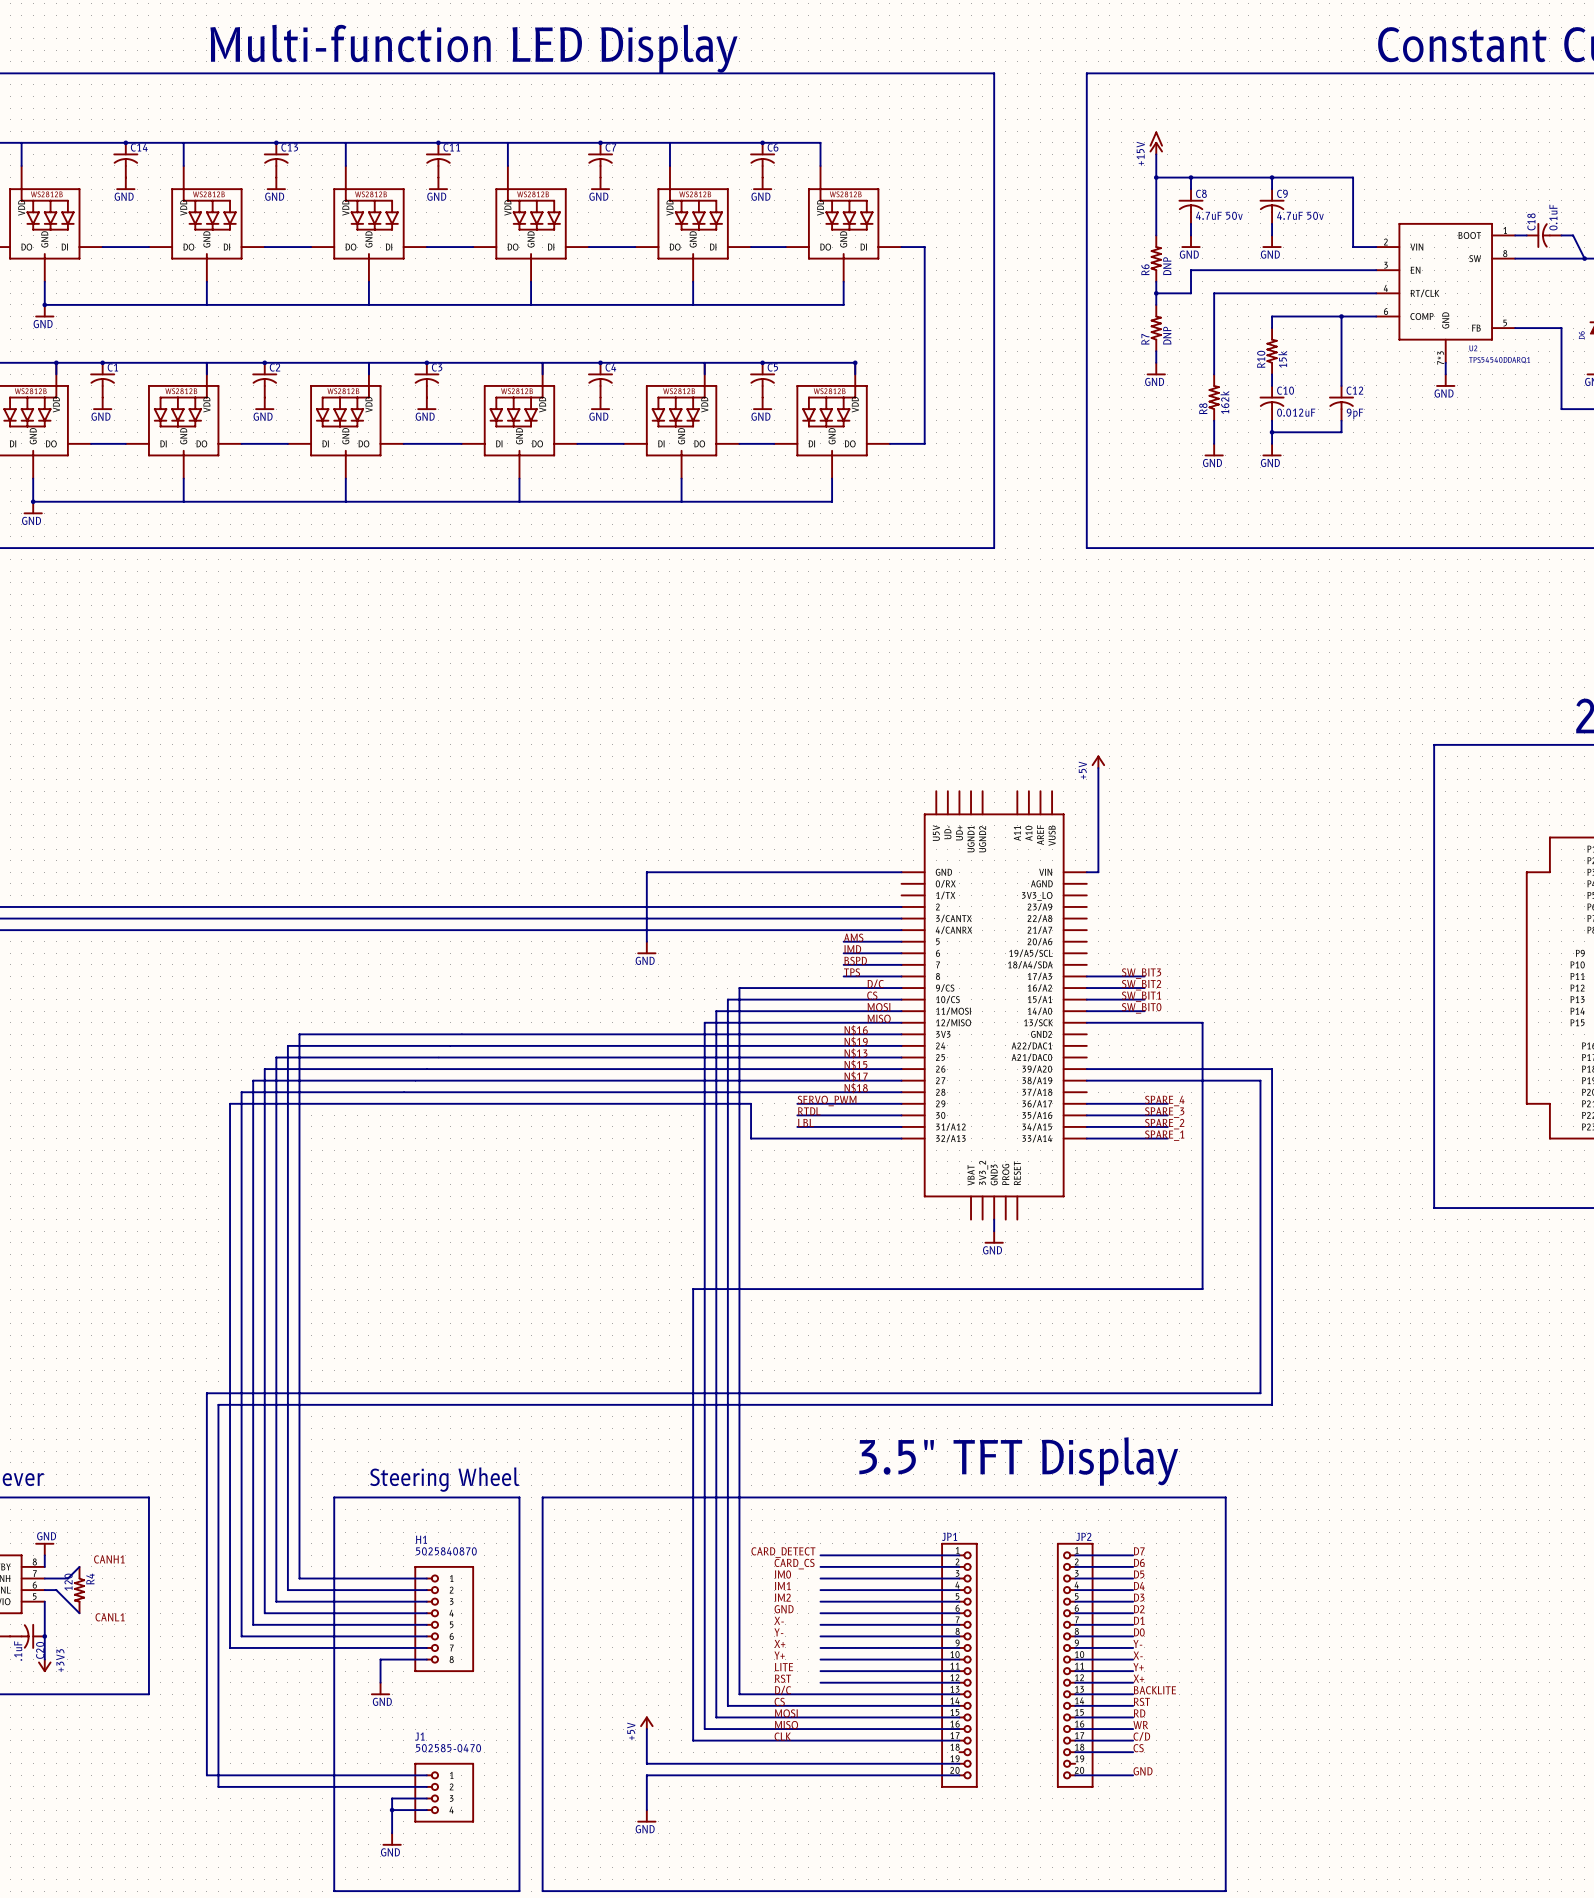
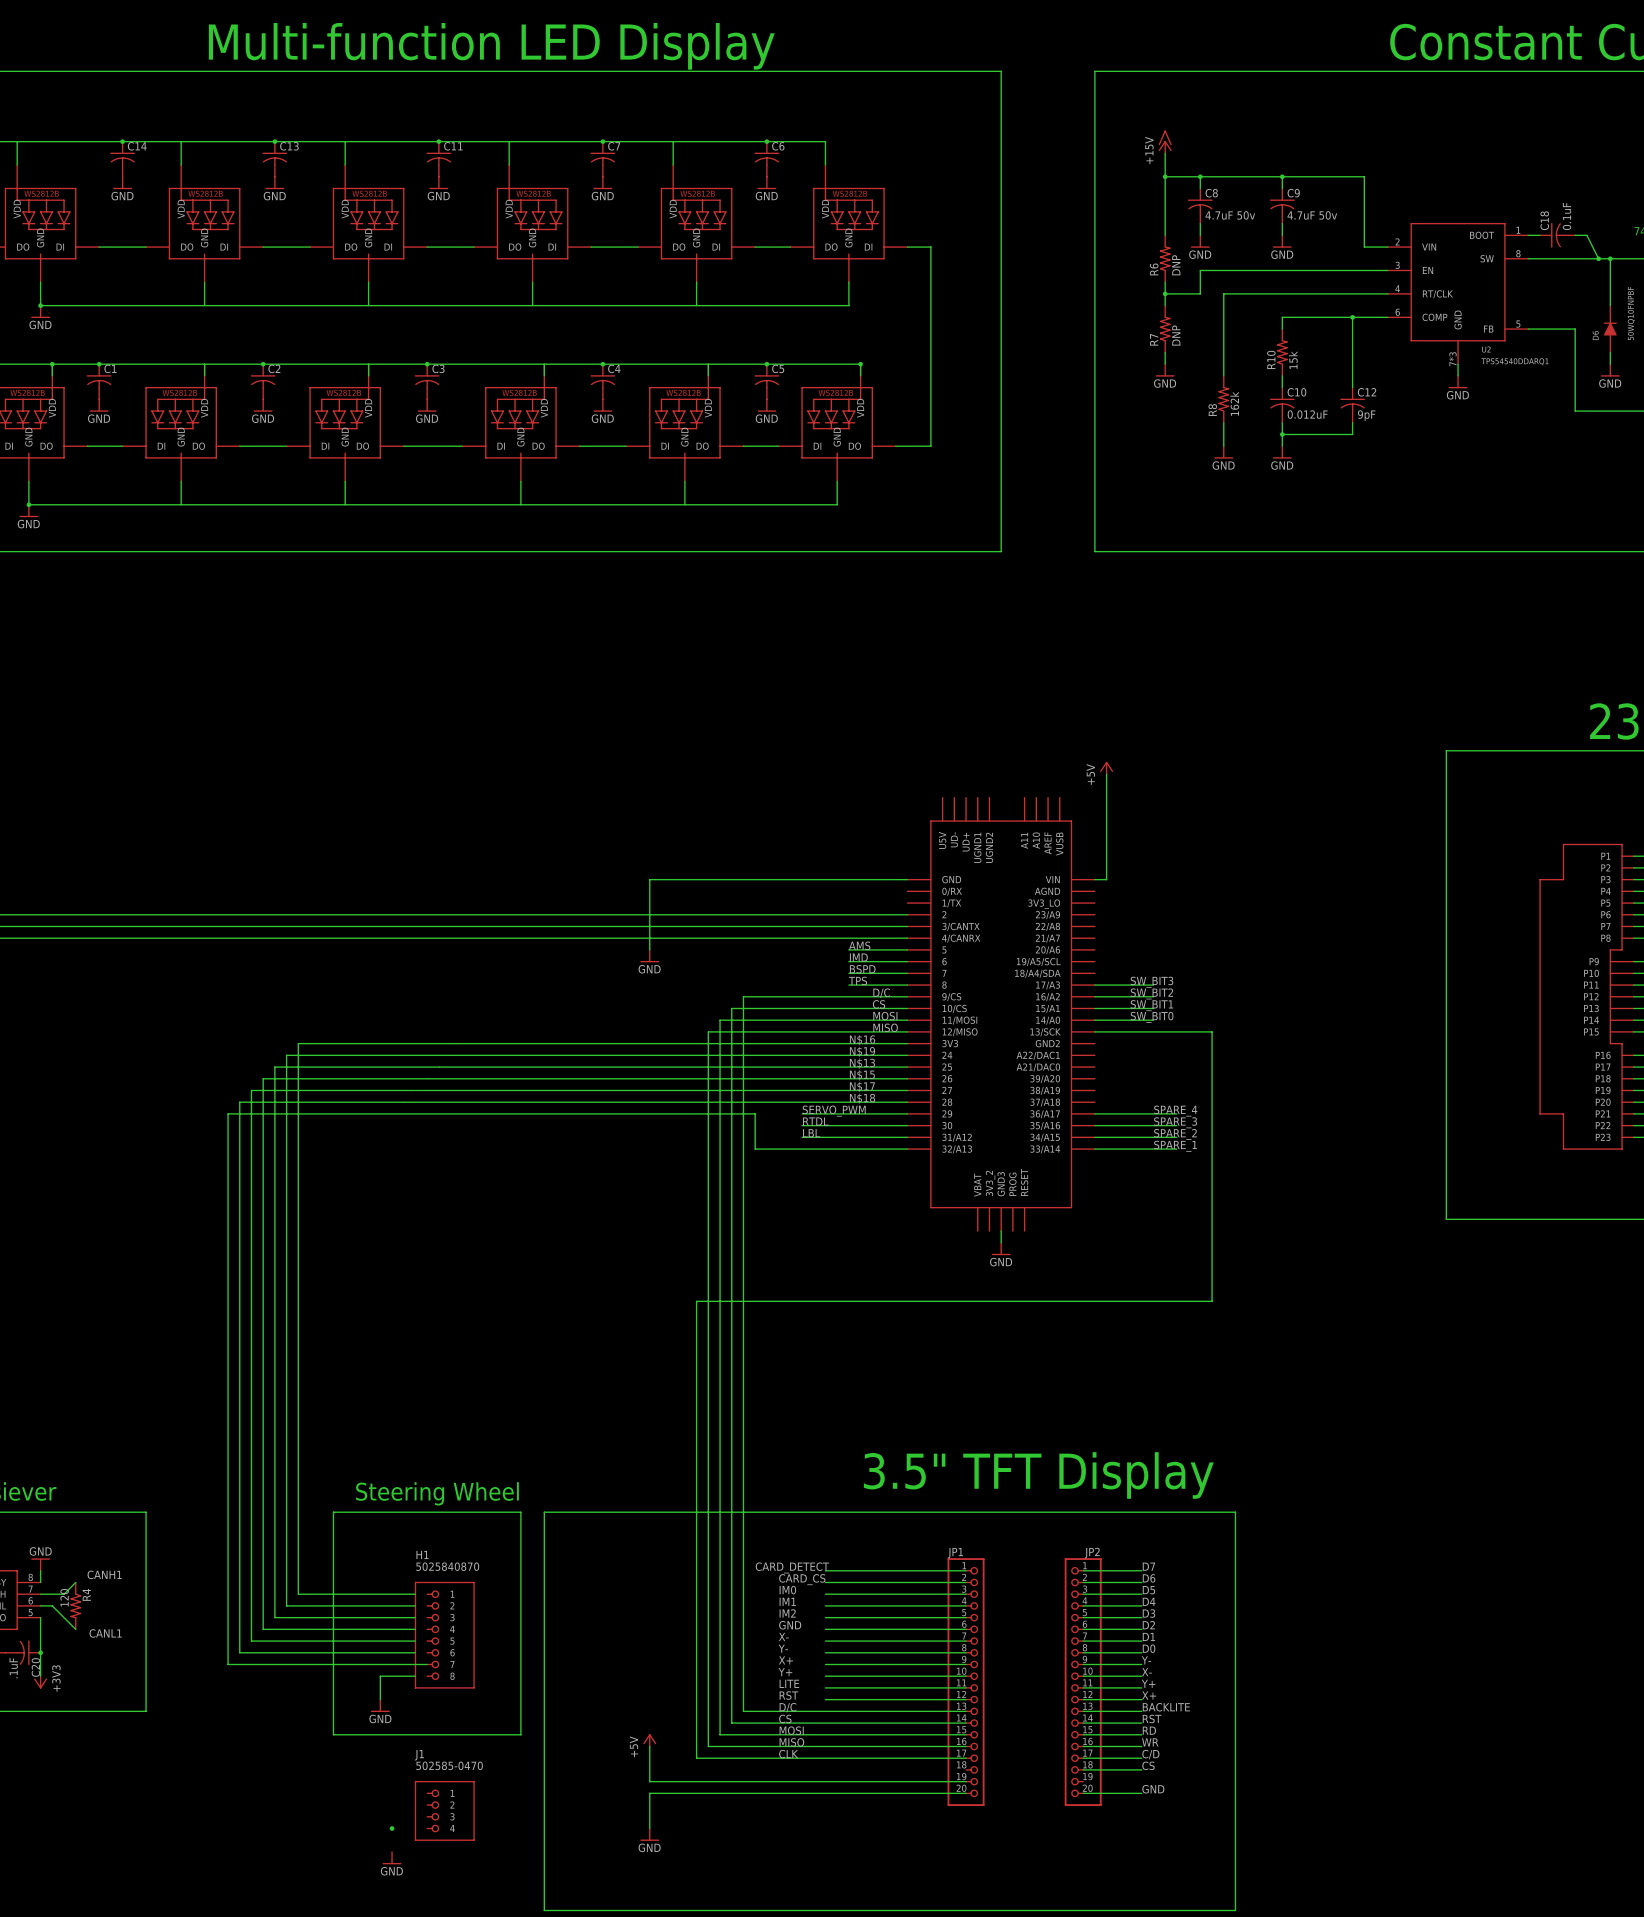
wire: (1086, 1069) (1272, 1069) (1272, 1404) (218, 1404) (218, 1786) (426, 1786) -> none
wire: (1086, 1080) (1260, 1080) (1260, 1393) (206, 1393) (206, 1775) (426, 1775) -> none
wire: (415, 1578) (426, 1578) -> none
wire: (415, 1590) (426, 1590) -> none
wire: (415, 1601) (426, 1601) -> none
wire: (415, 1613) (426, 1613) -> none
wire: (415, 1624) (426, 1624) -> none
wire: (415, 1636) (426, 1636) -> none
wire: (415, 1659) (426, 1659) -> none
wire: (334, 1717) (334, 1891) (519, 1891) (519, 1717) -> (333, 1734) (520, 1734)
wire: (426, 1798) (392, 1798) (392, 1833) -> none
wire: (392, 1810) (426, 1810) -> none

